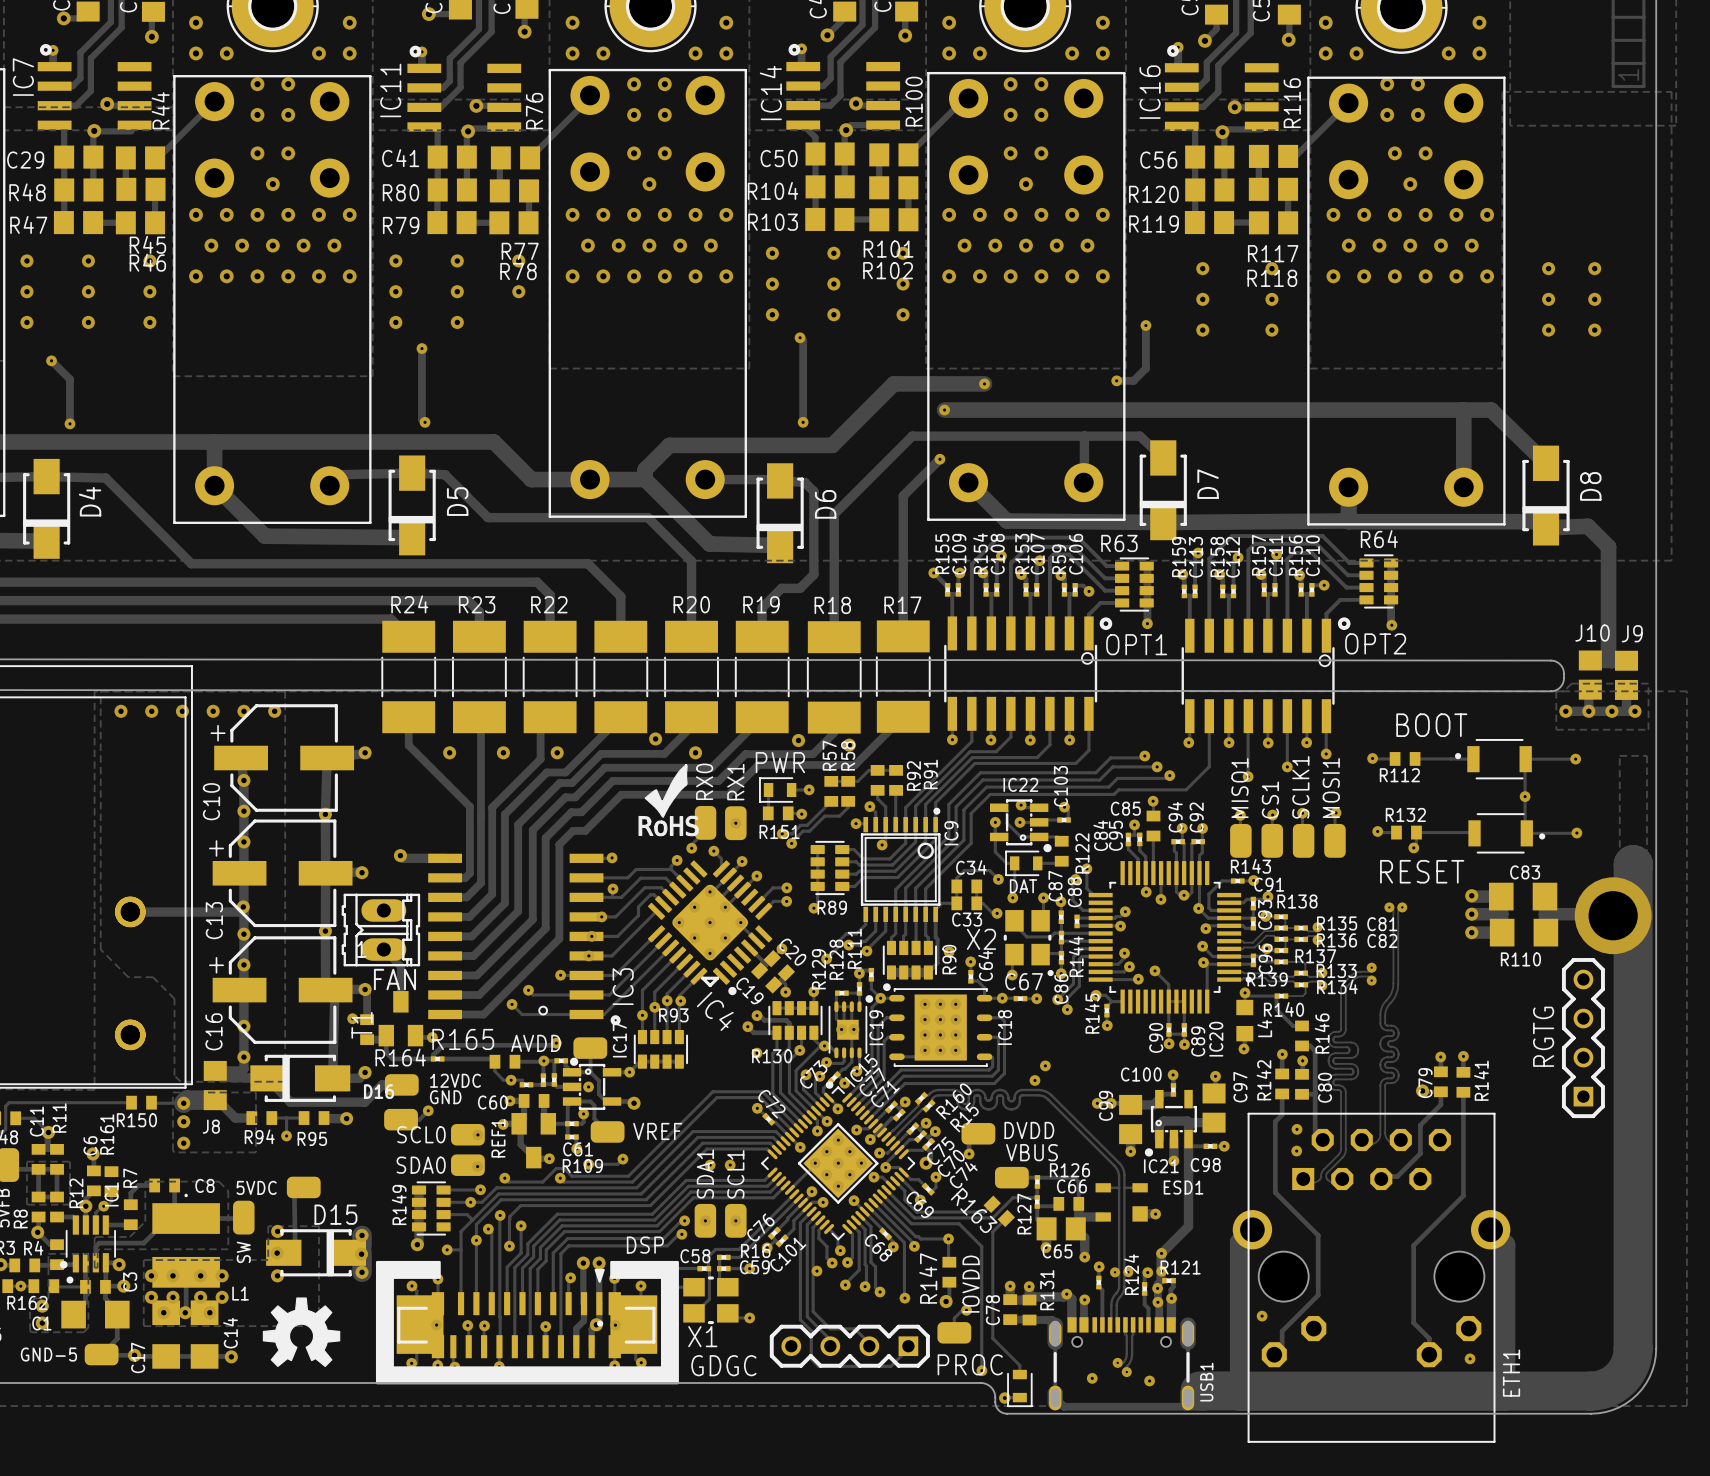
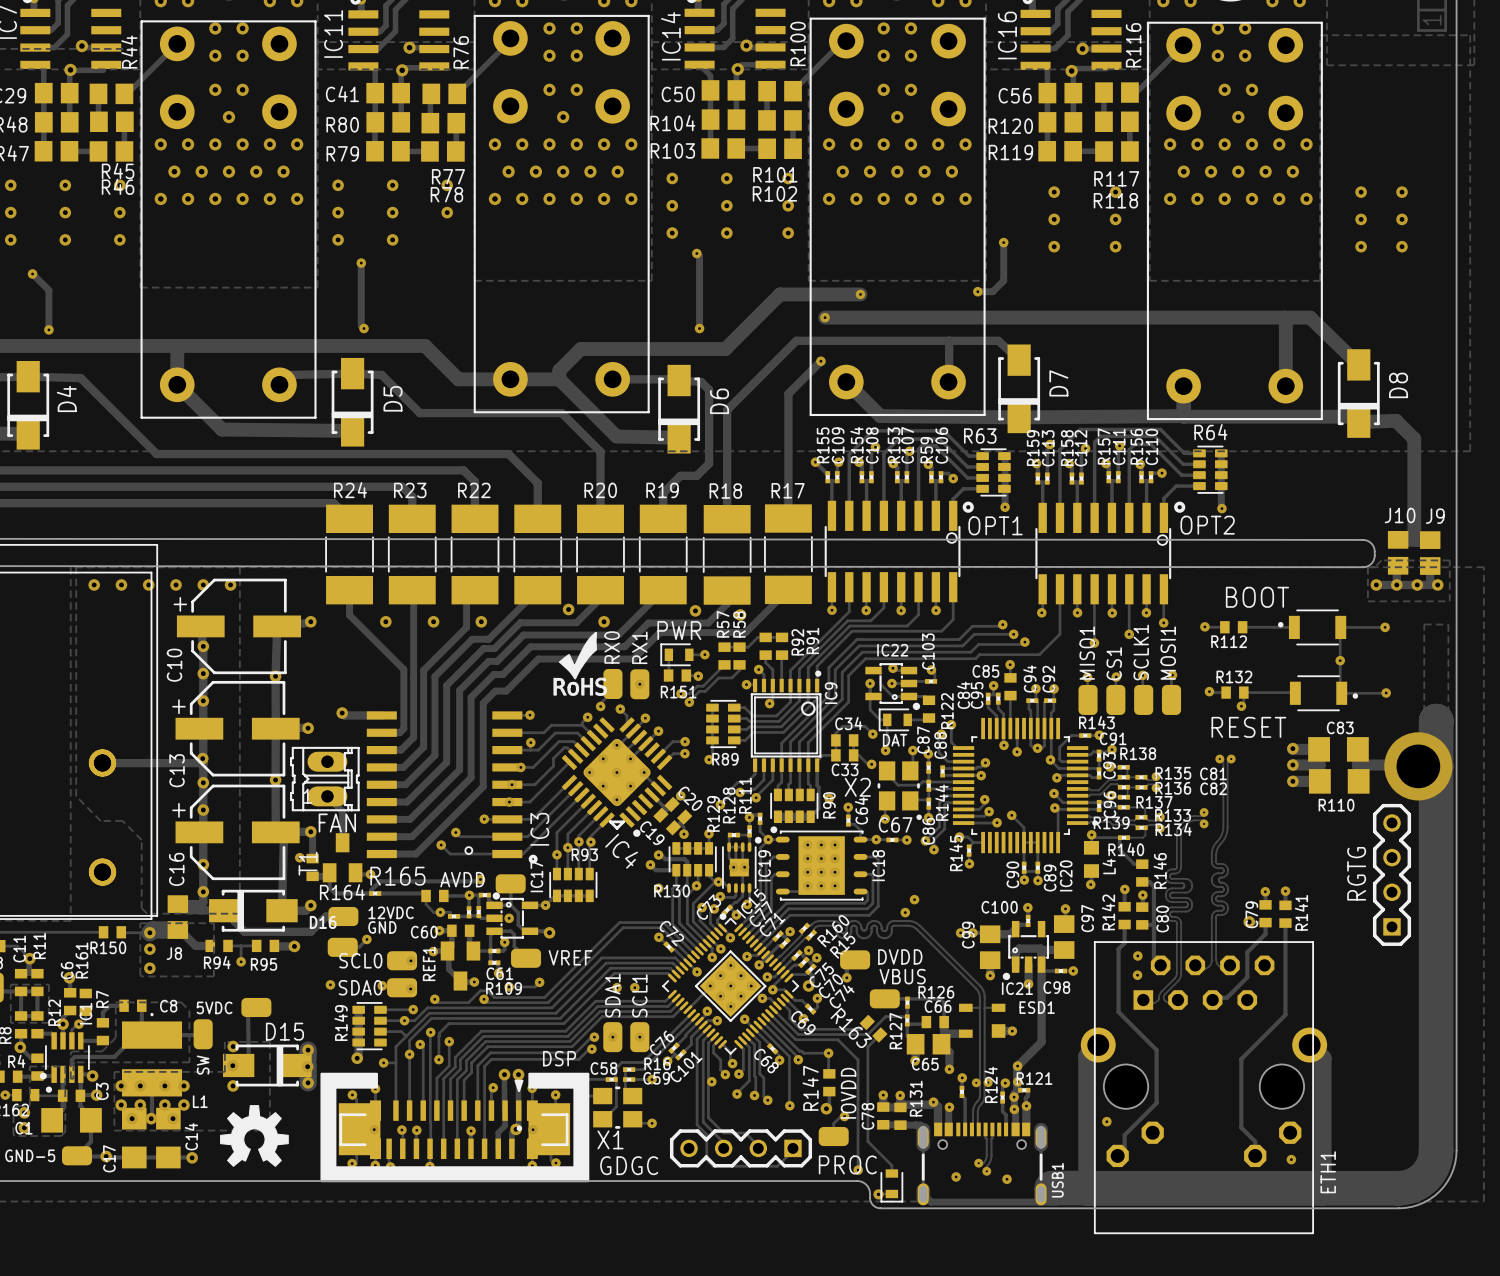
via: none -> (330, 984)
via: none -> (382, 985)

